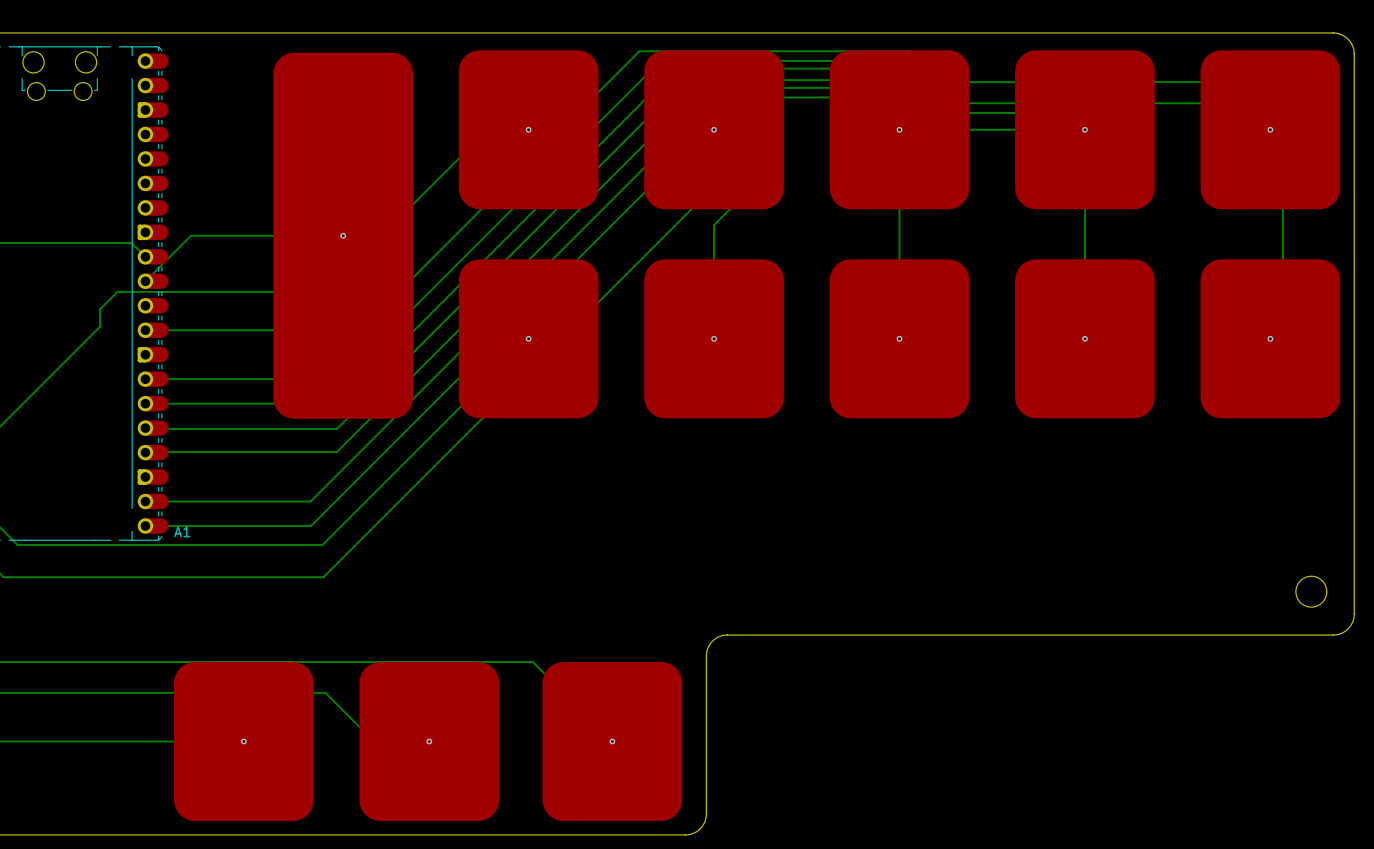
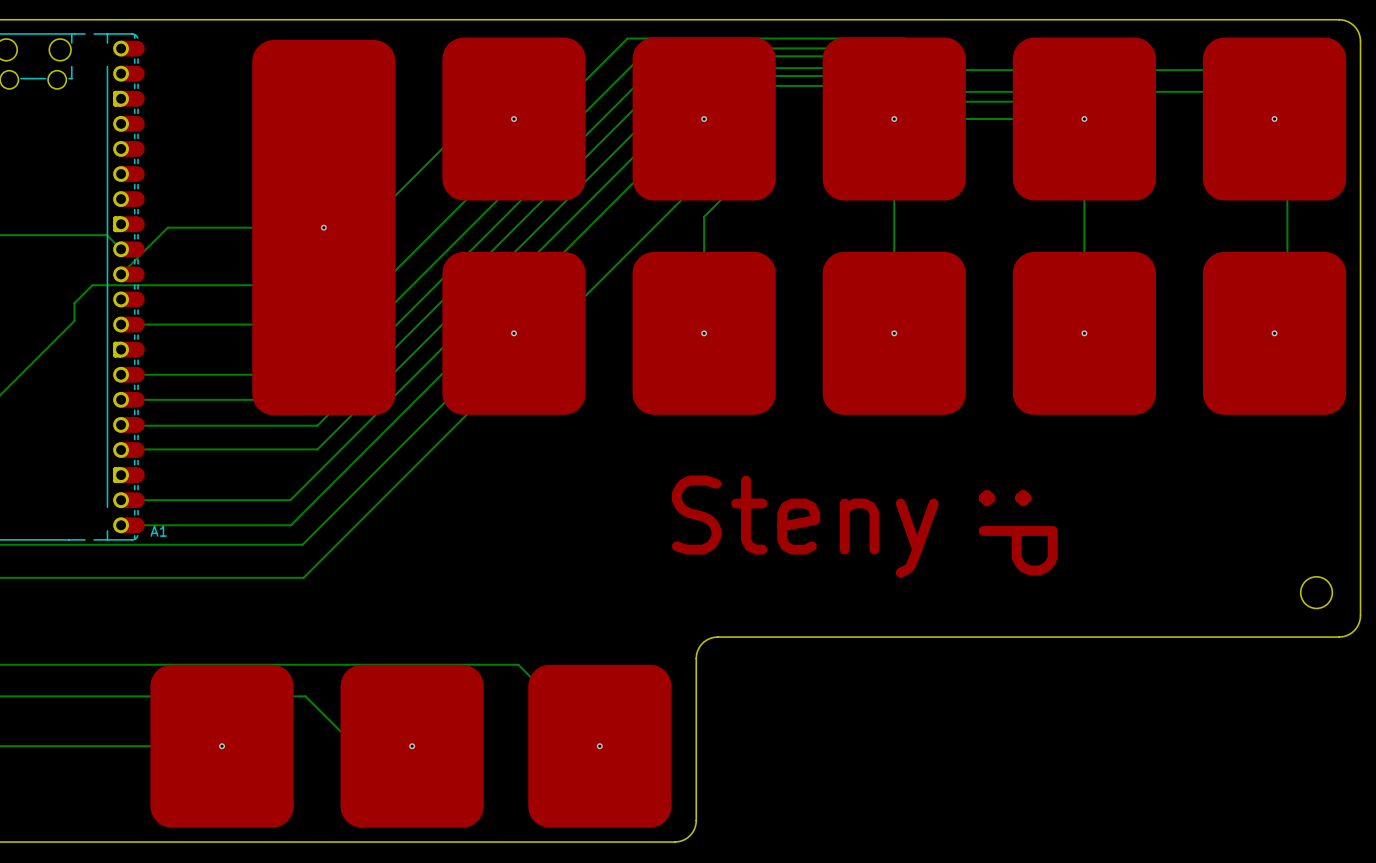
text: none -> Steny (805, 526)
text: none -> :P (1018, 532)

